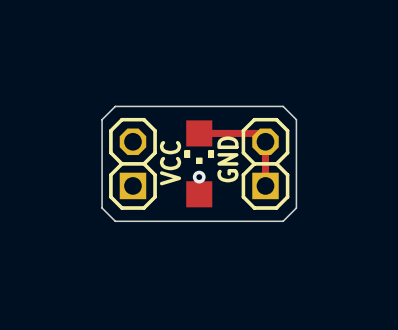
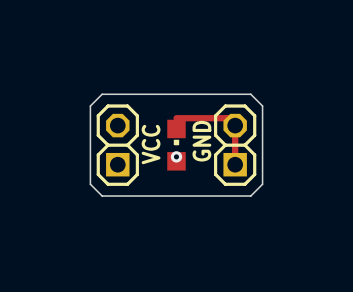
part footprint: [184, 120, 215, 208] -> [167, 119, 186, 171]
drawing: [184, 150, 215, 158] -> none

